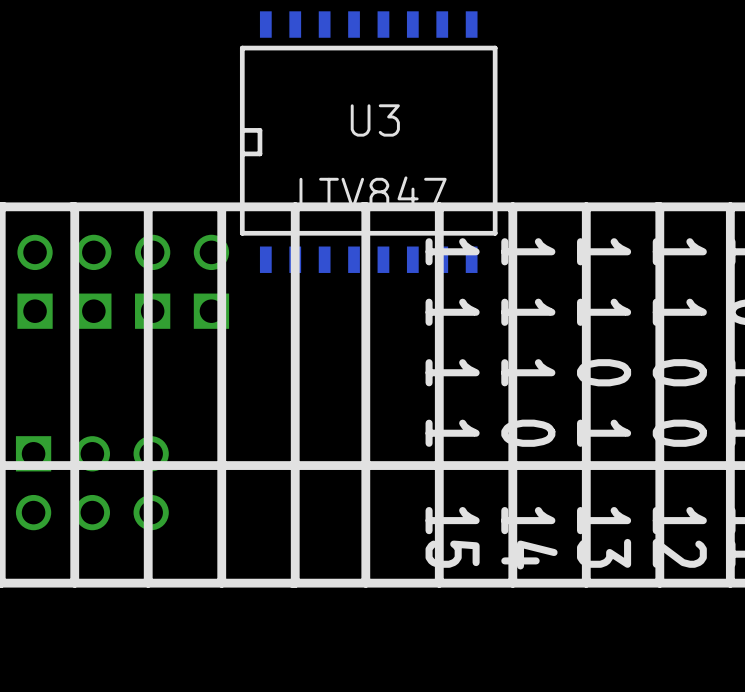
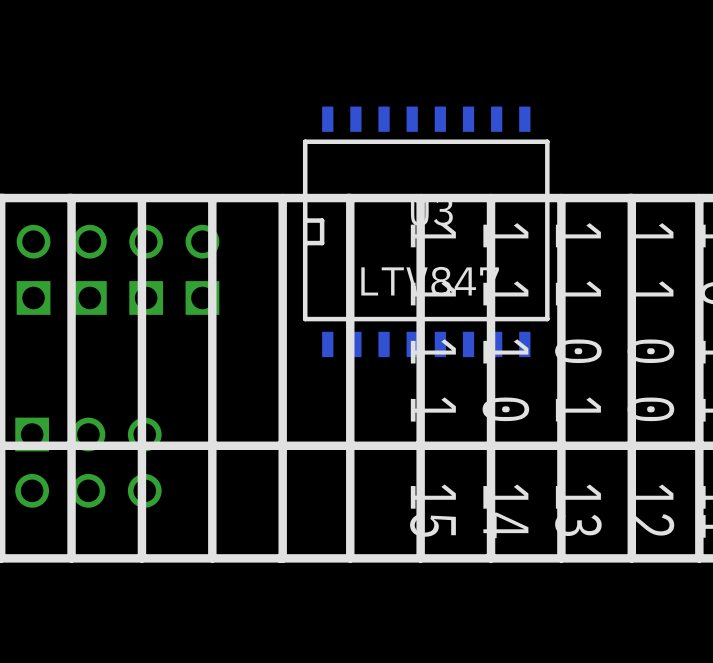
U3 position: (368, 142) -> (426, 231)

